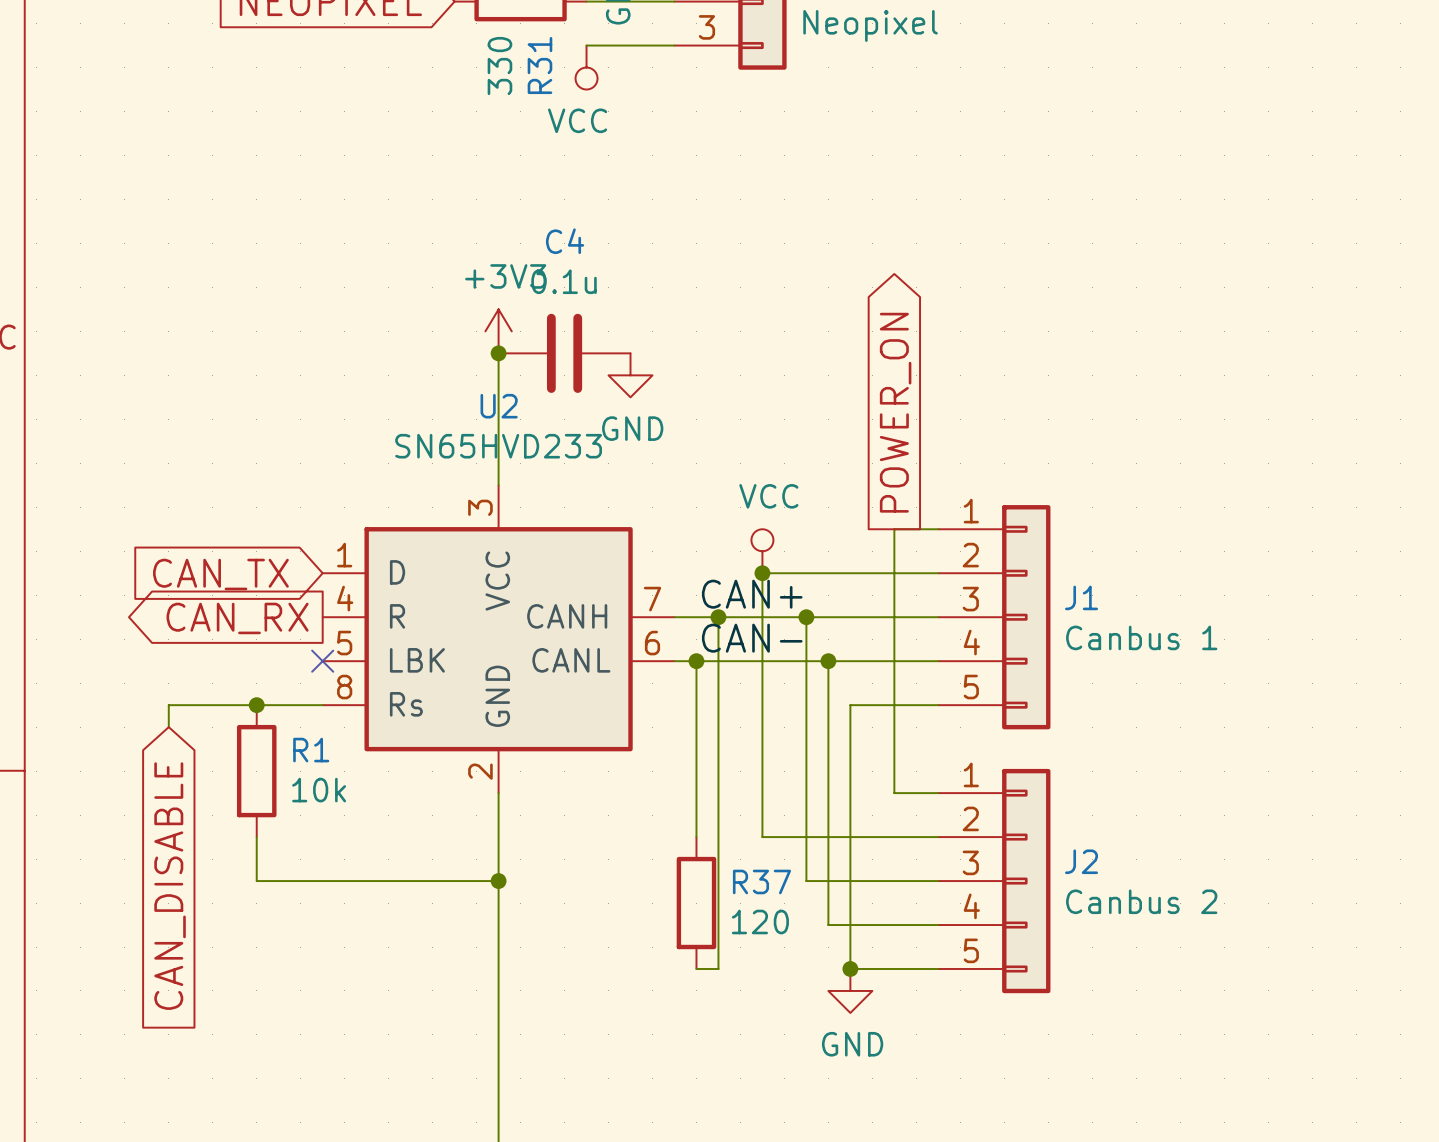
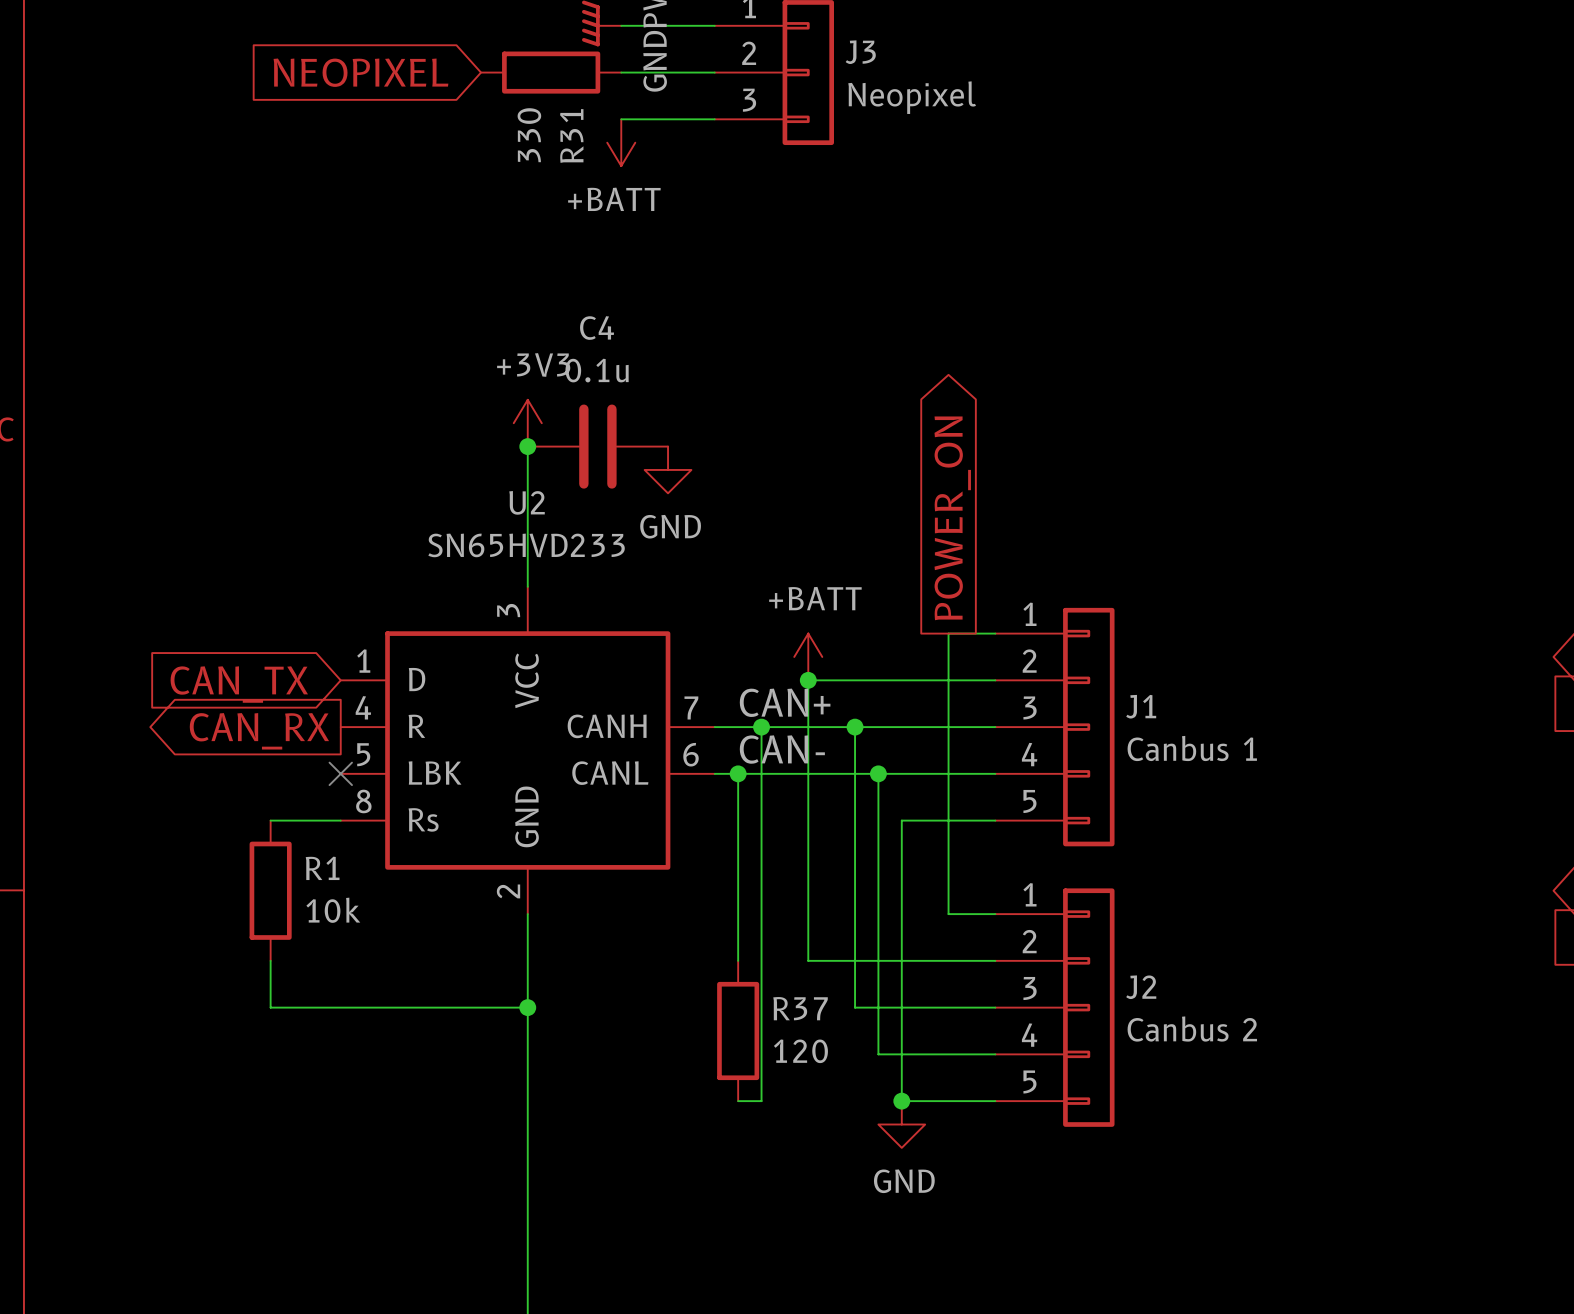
power symbol: VCC (586, 67) -> +BATT (621, 142)
power symbol: VCC (762, 551) -> +BATT (808, 656)
wire: (256, 705) (168, 705) (168, 727) -> none
junction: (256, 705) -> none
global label: CAN_DISABLE (170, 886) -> none

